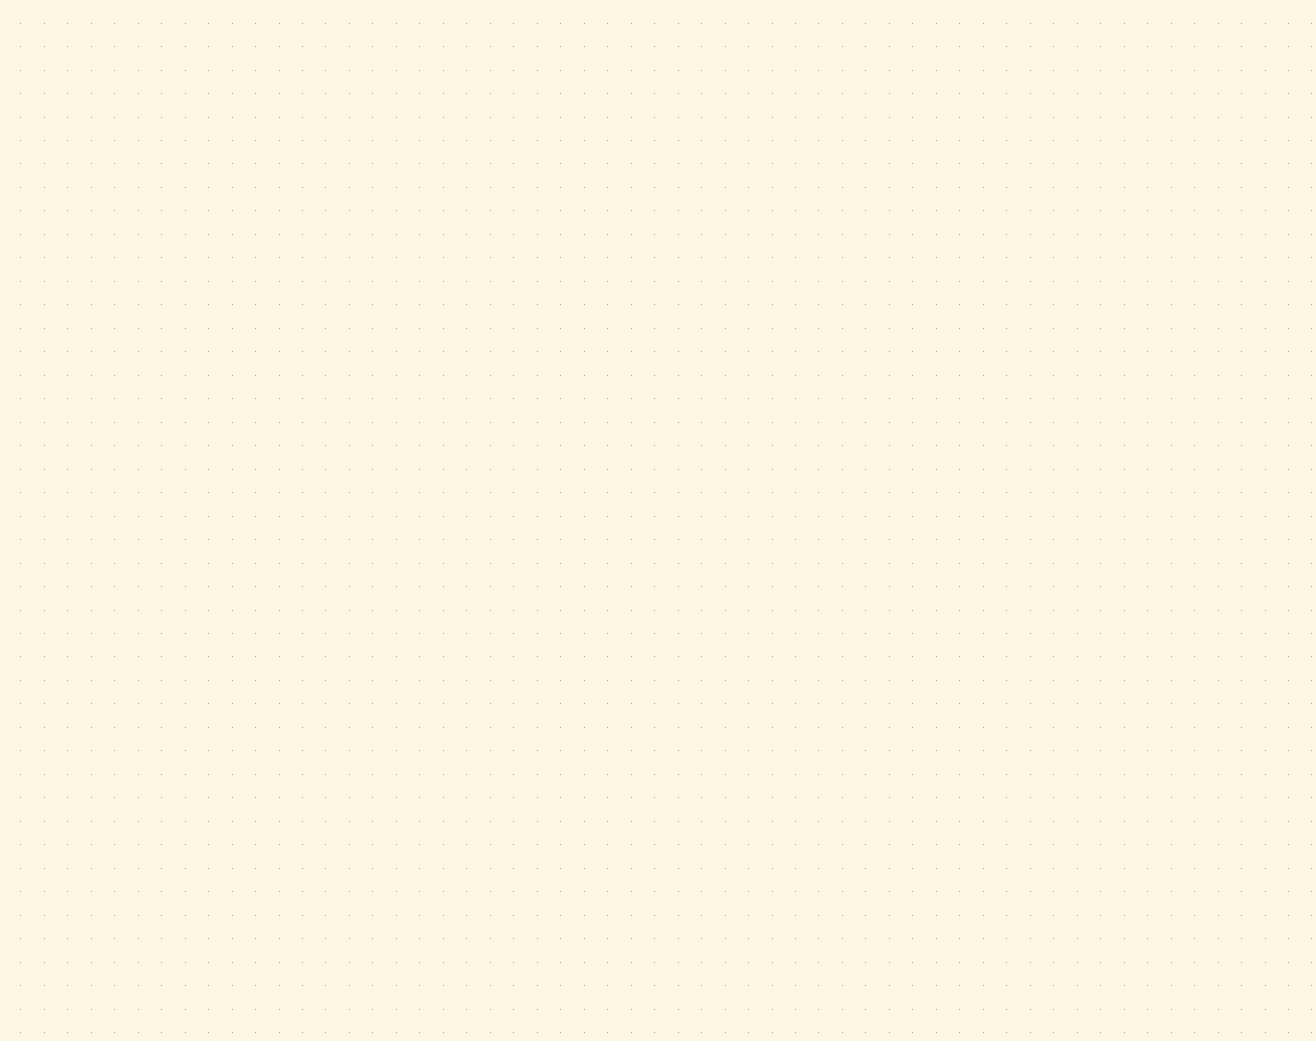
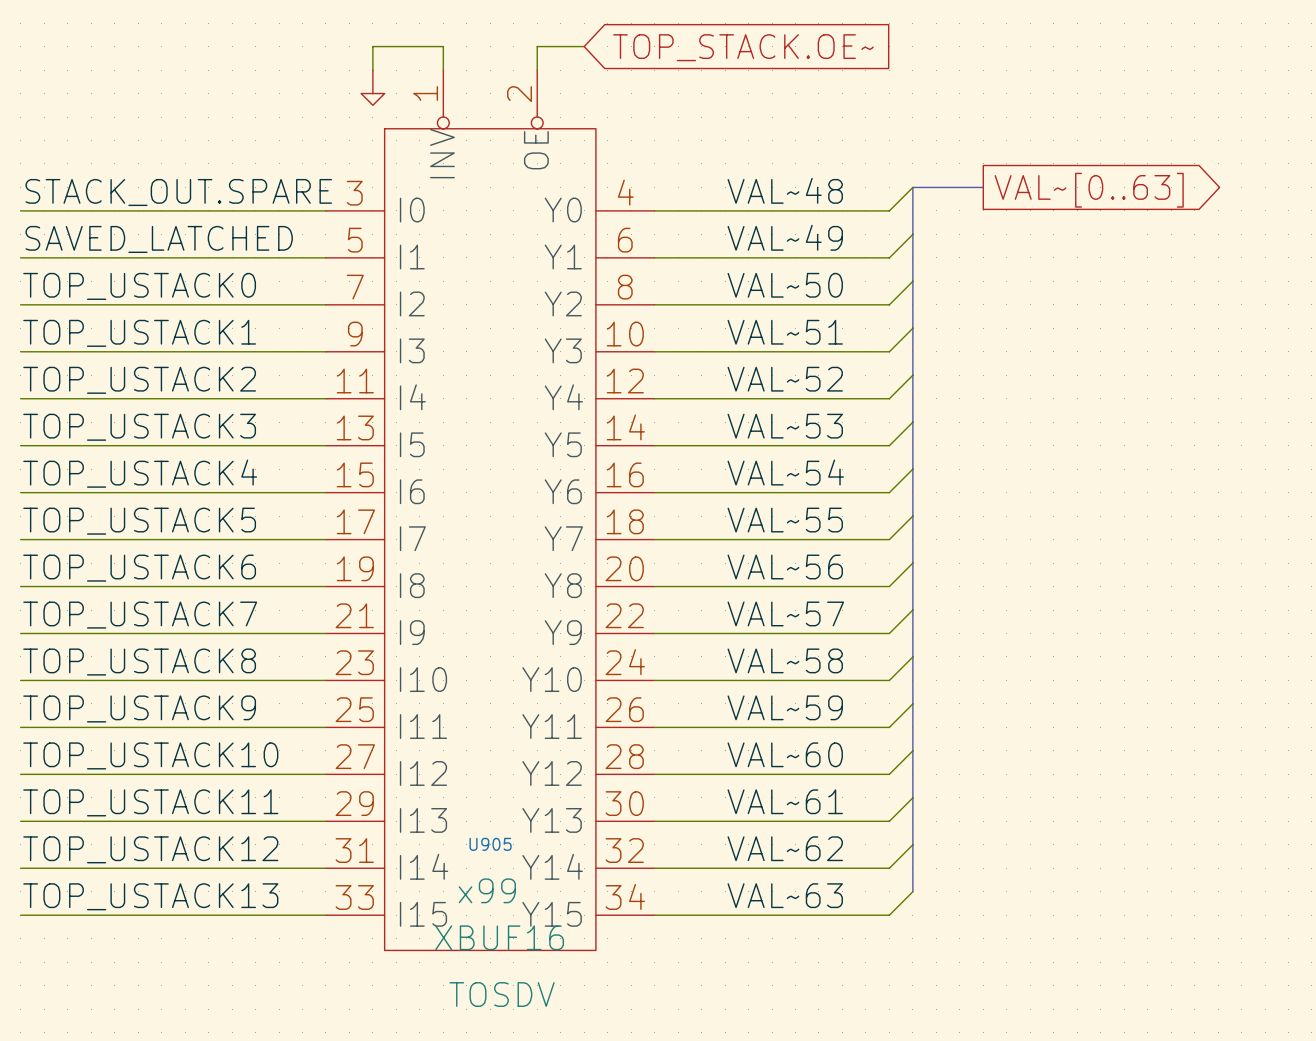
wire: none -> (584, 46) (537, 46) (537, 70)
global label: none -> TOP_STACK.OE~ (743, 47)
wire: none -> (372, 70) (372, 46) (443, 46) (443, 70)
power symbol: none -> (372, 88)
wire: none -> (912, 187) (889, 210) (654, 210)
bus: none -> (983, 187) (912, 187) (912, 891)
label: none -> VAL~48 (785, 190)
global label: none -> VAL~[0..63] (1089, 190)
label: none -> STACK_OUT.SPARE (178, 192)
wire: none -> (20, 210) (325, 210)
wire: none -> (912, 234) (889, 257) (654, 257)
label: none -> VAL~49 (785, 237)
label: none -> SAVED_LATCHED (159, 239)
wire: none -> (20, 257) (325, 257)
wire: none -> (912, 281) (889, 304) (654, 304)
label: none -> VAL~50 (785, 285)
label: none -> TOP_USTACK0 (139, 286)
wire: none -> (20, 304) (325, 304)
wire: none -> (912, 328) (889, 351) (654, 351)
label: none -> VAL~51 (785, 332)
label: none -> TOP_USTACK1 (139, 333)
wire: none -> (20, 351) (325, 351)
wire: none -> (912, 375) (889, 398) (654, 398)
label: none -> VAL~52 (785, 379)
label: none -> TOP_USTACK2 (139, 380)
wire: none -> (20, 398) (325, 398)
wire: none -> (912, 422) (889, 445) (654, 445)
label: none -> VAL~53 (785, 426)
label: none -> TOP_USTACK3 (139, 427)
wire: none -> (20, 445) (325, 445)
wire: none -> (912, 469) (889, 492) (654, 492)
label: none -> VAL~54 (785, 472)
label: none -> TOP_USTACK4 (140, 473)
wire: none -> (20, 492) (325, 492)
U905: none -> XBUF16 (490, 510)
wire: none -> (912, 516) (889, 539) (654, 539)
label: none -> VAL~55 (785, 520)
label: none -> TOP_USTACK5 (139, 521)
wire: none -> (20, 539) (325, 539)
wire: none -> (912, 563) (889, 586) (654, 586)
label: none -> VAL~56 (785, 567)
label: none -> TOP_USTACK6 (139, 568)
wire: none -> (20, 586) (325, 586)
wire: none -> (912, 610) (889, 633) (654, 633)
label: none -> VAL~57 (785, 613)
label: none -> TOP_USTACK7 (140, 615)
wire: none -> (20, 633) (325, 633)
wire: none -> (912, 656) (889, 680) (654, 680)
label: none -> VAL~58 (785, 660)
label: none -> TOP_USTACK8 (139, 662)
wire: none -> (20, 680) (325, 680)
wire: none -> (912, 703) (889, 727) (654, 727)
label: none -> VAL~59 (785, 707)
label: none -> TOP_USTACK9 (139, 708)
wire: none -> (20, 727) (325, 727)
wire: none -> (912, 750) (889, 774) (654, 774)
label: none -> VAL~60 (785, 754)
label: none -> TOP_USTACK10 (150, 755)
wire: none -> (20, 774) (325, 774)
wire: none -> (912, 797) (889, 821) (654, 821)
label: none -> VAL~61 (785, 801)
label: none -> TOP_USTACK11 (150, 802)
wire: none -> (20, 821) (325, 821)
wire: none -> (912, 844) (889, 868) (654, 868)
label: none -> VAL~62 (785, 848)
label: none -> TOP_USTACK12 (150, 849)
wire: none -> (20, 868) (325, 868)
wire: none -> (912, 891) (889, 915) (654, 915)
label: none -> VAL~63 (785, 895)
label: none -> TOP_USTACK13 (150, 896)
wire: none -> (20, 915) (325, 915)

